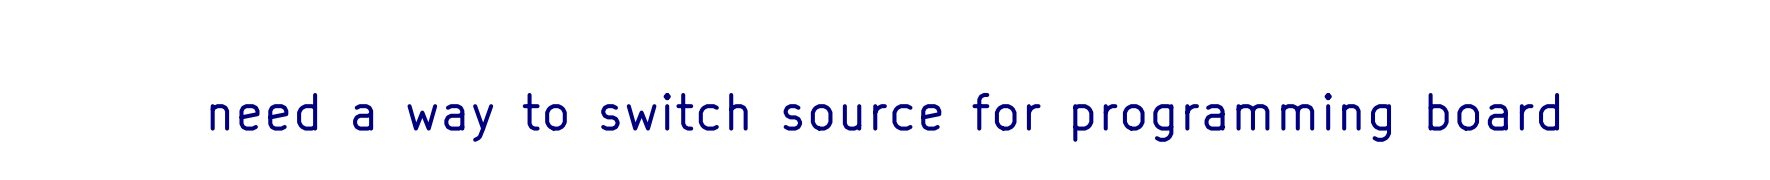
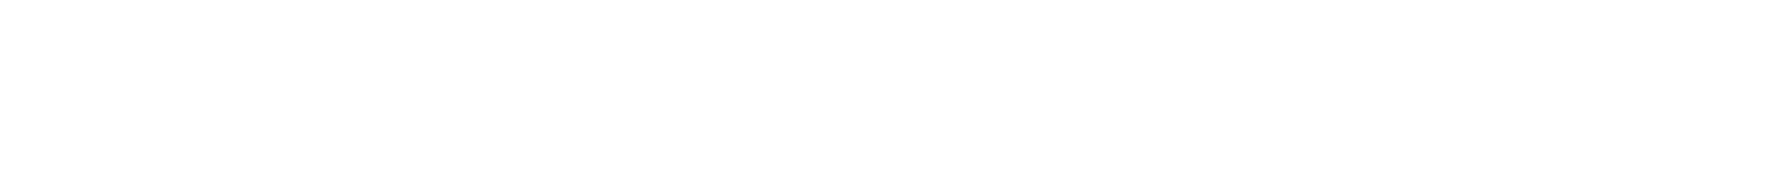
text: need a way to switch source for programming board (884, 117) -> none

